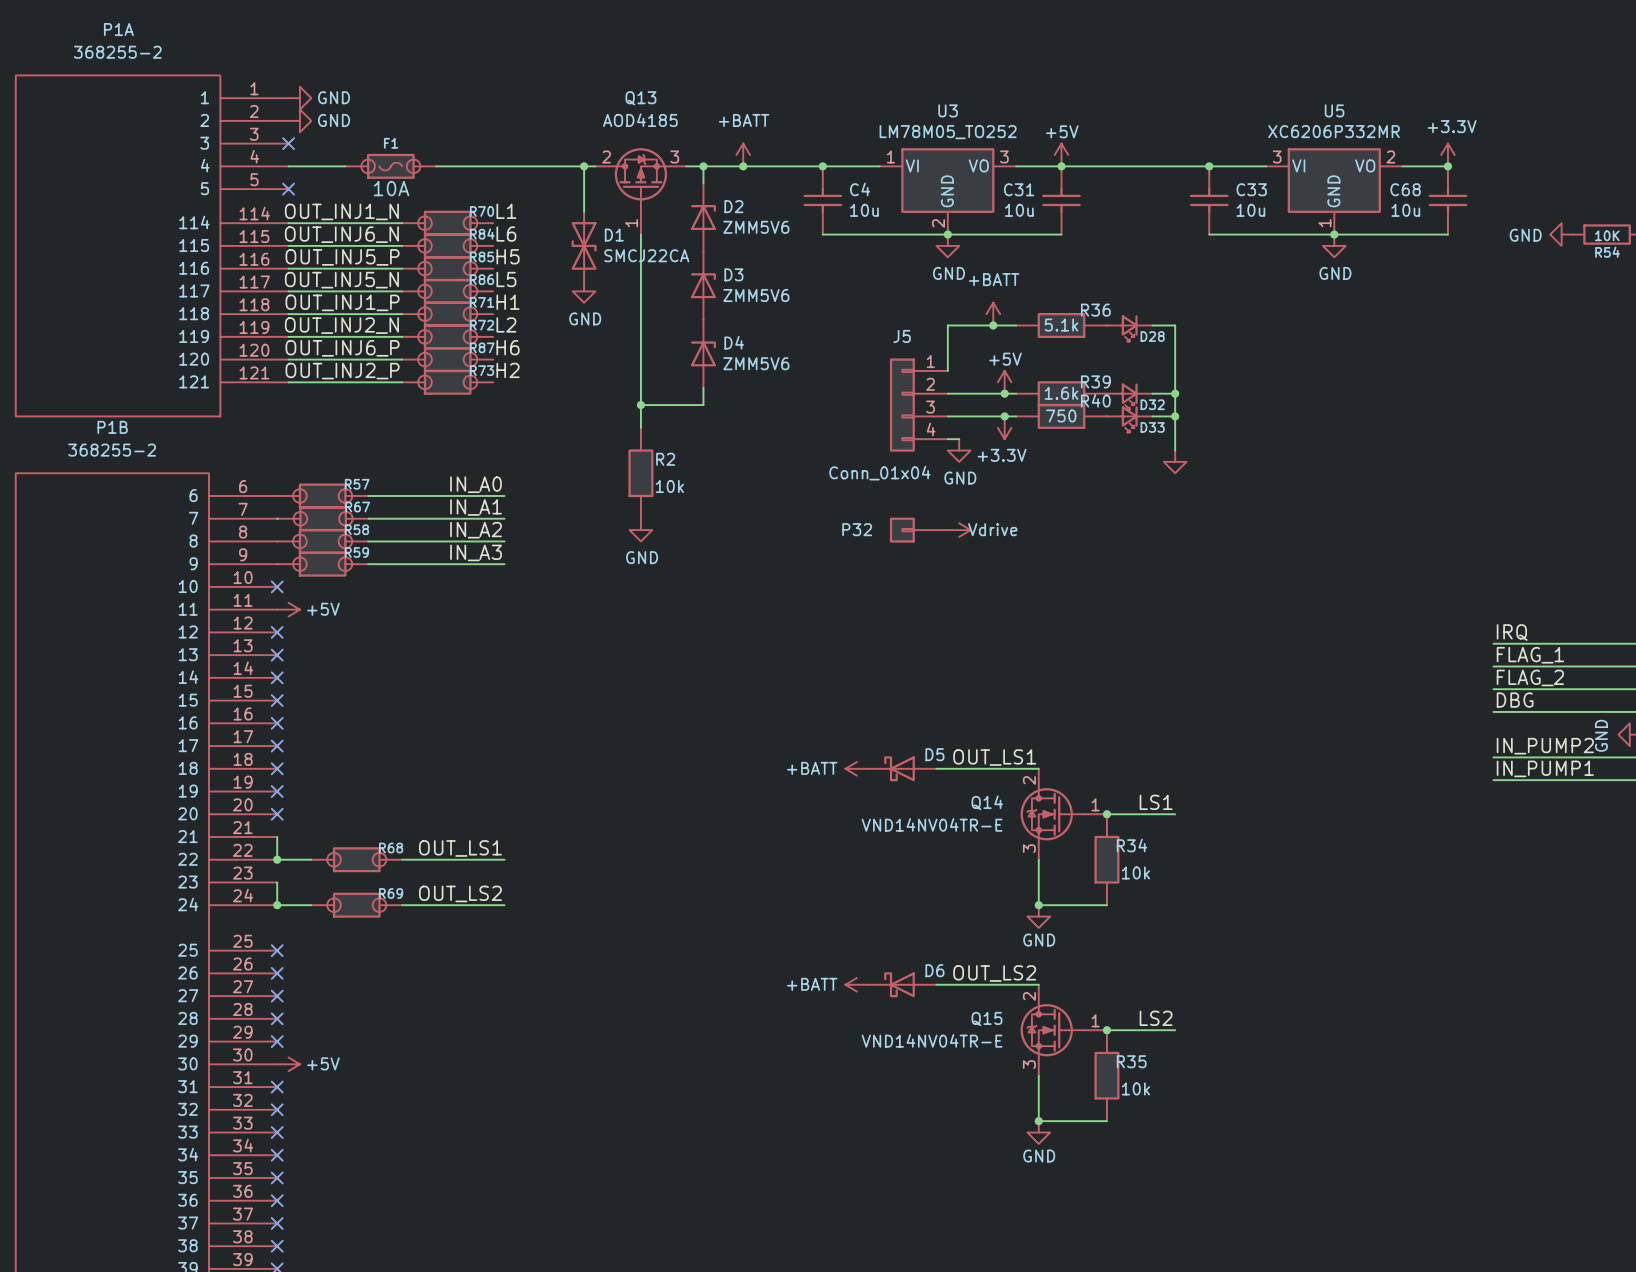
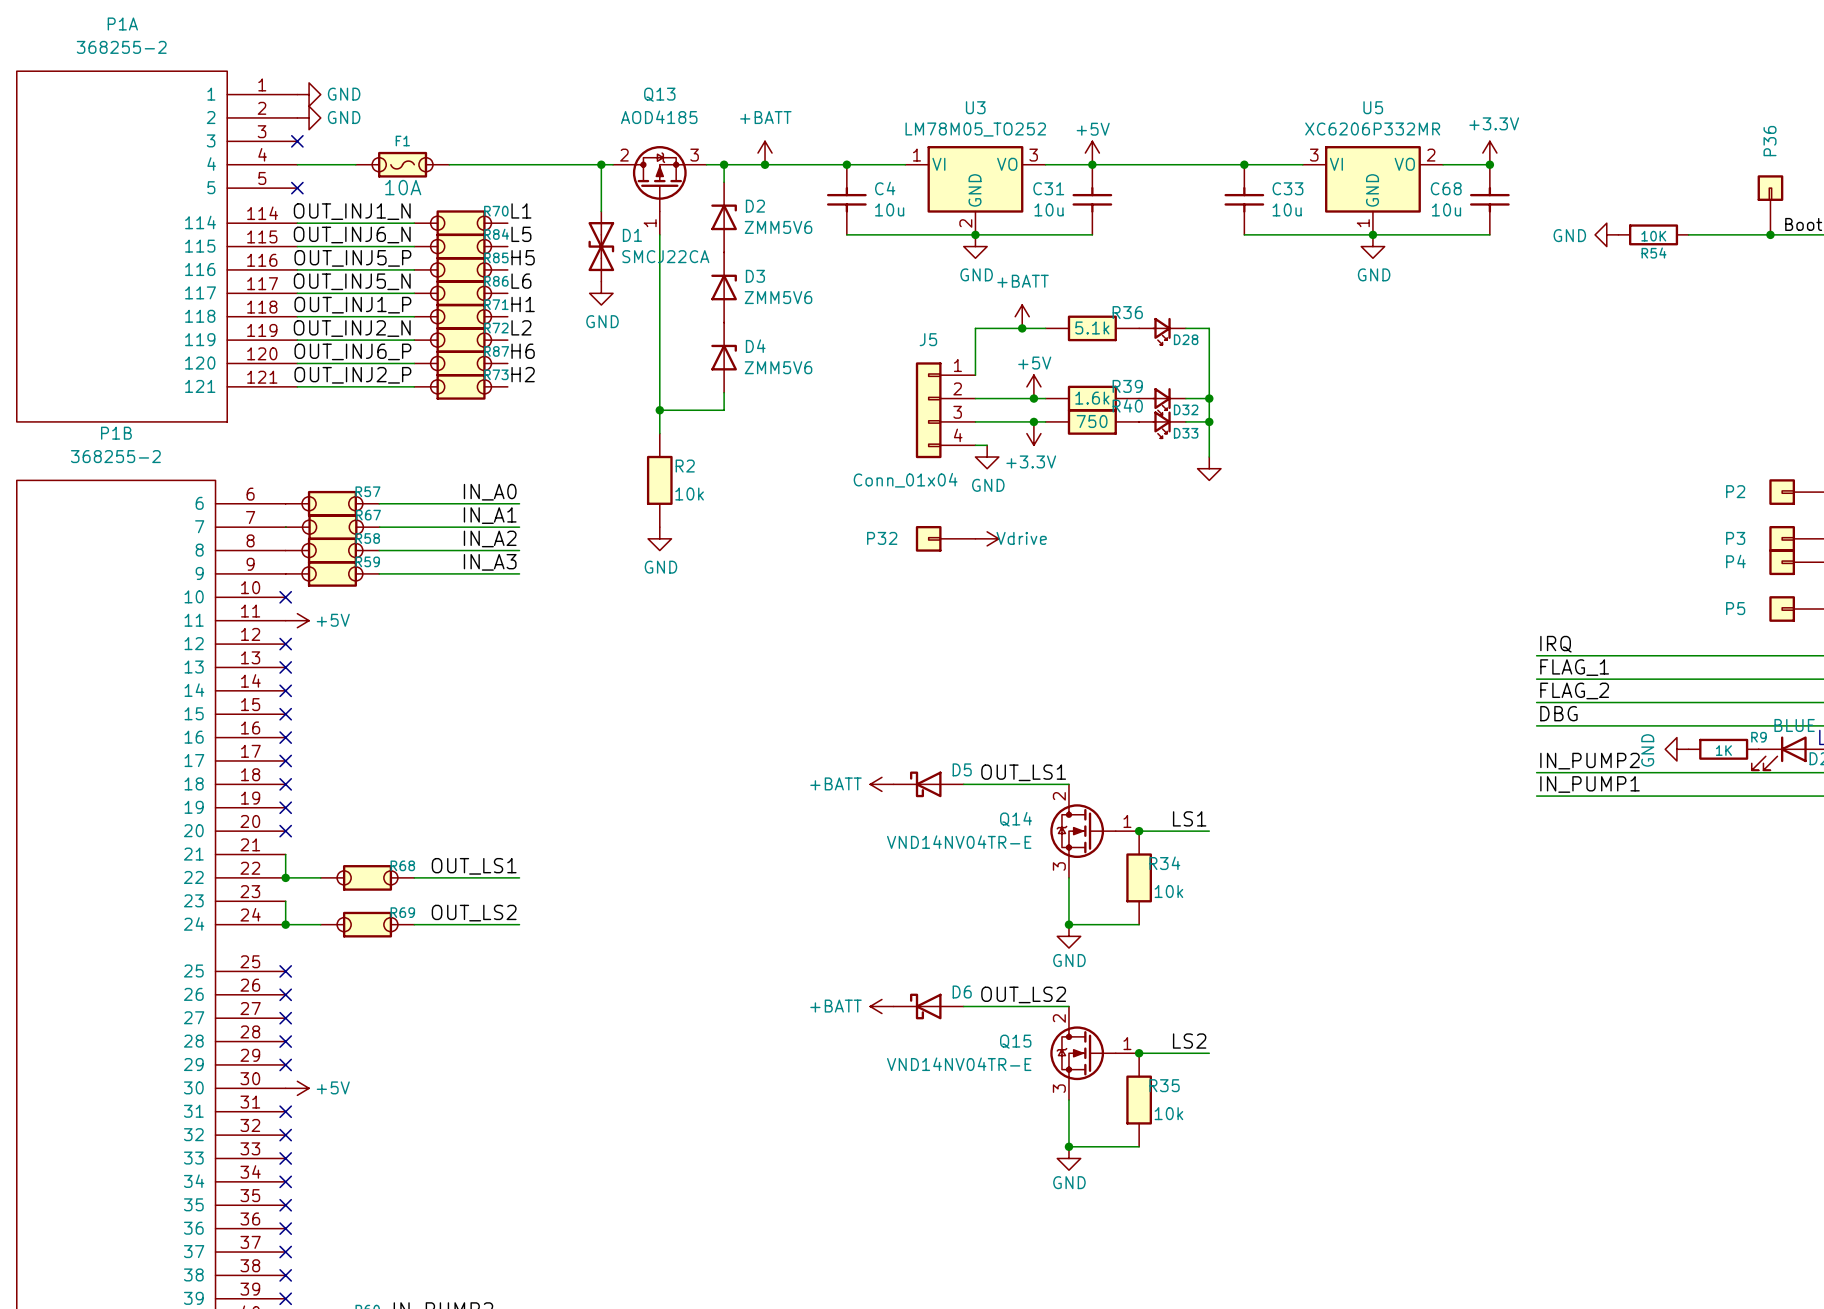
label: L6 (506, 234) -> L5 (521, 234)
label: L5 (506, 279) -> L6 (521, 281)

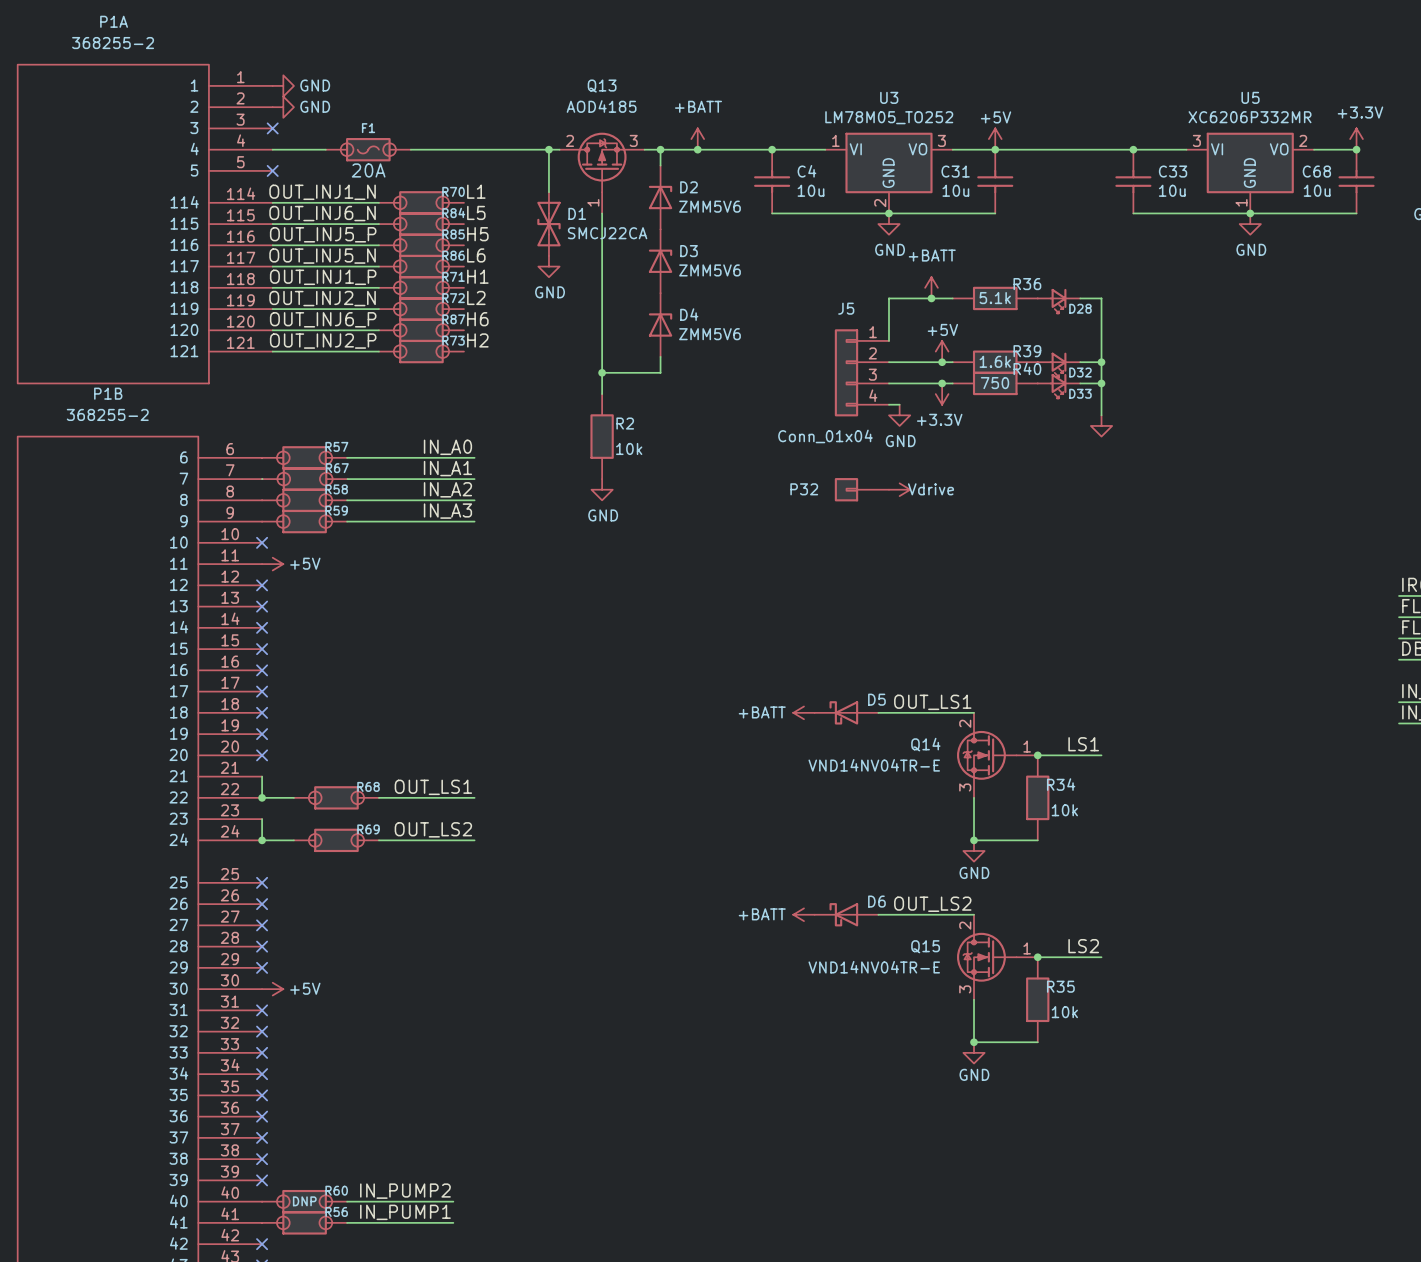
F1 text: 10A (403, 187) -> 20A (368, 170)

